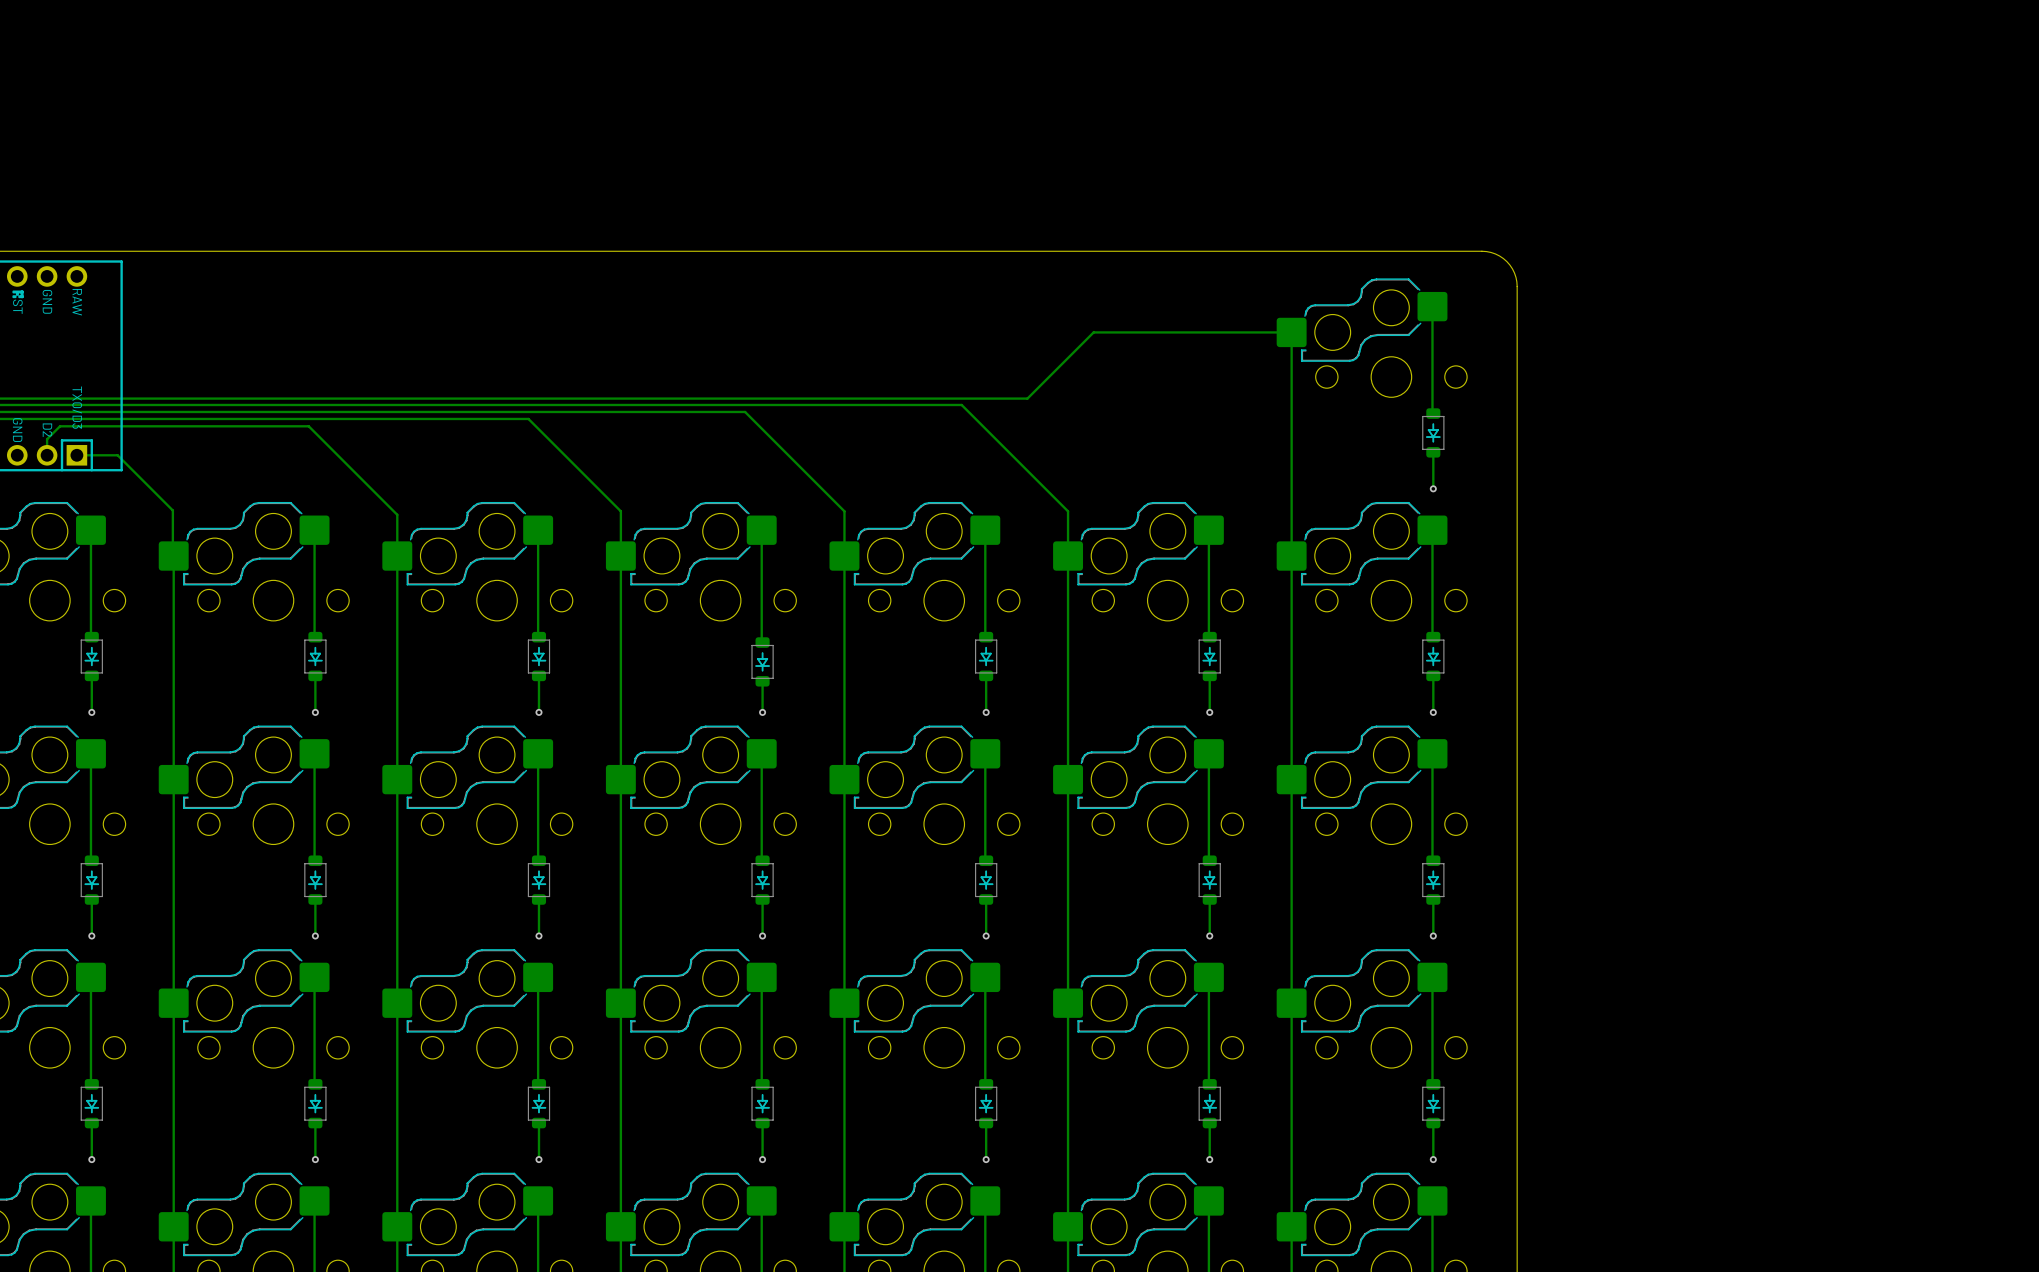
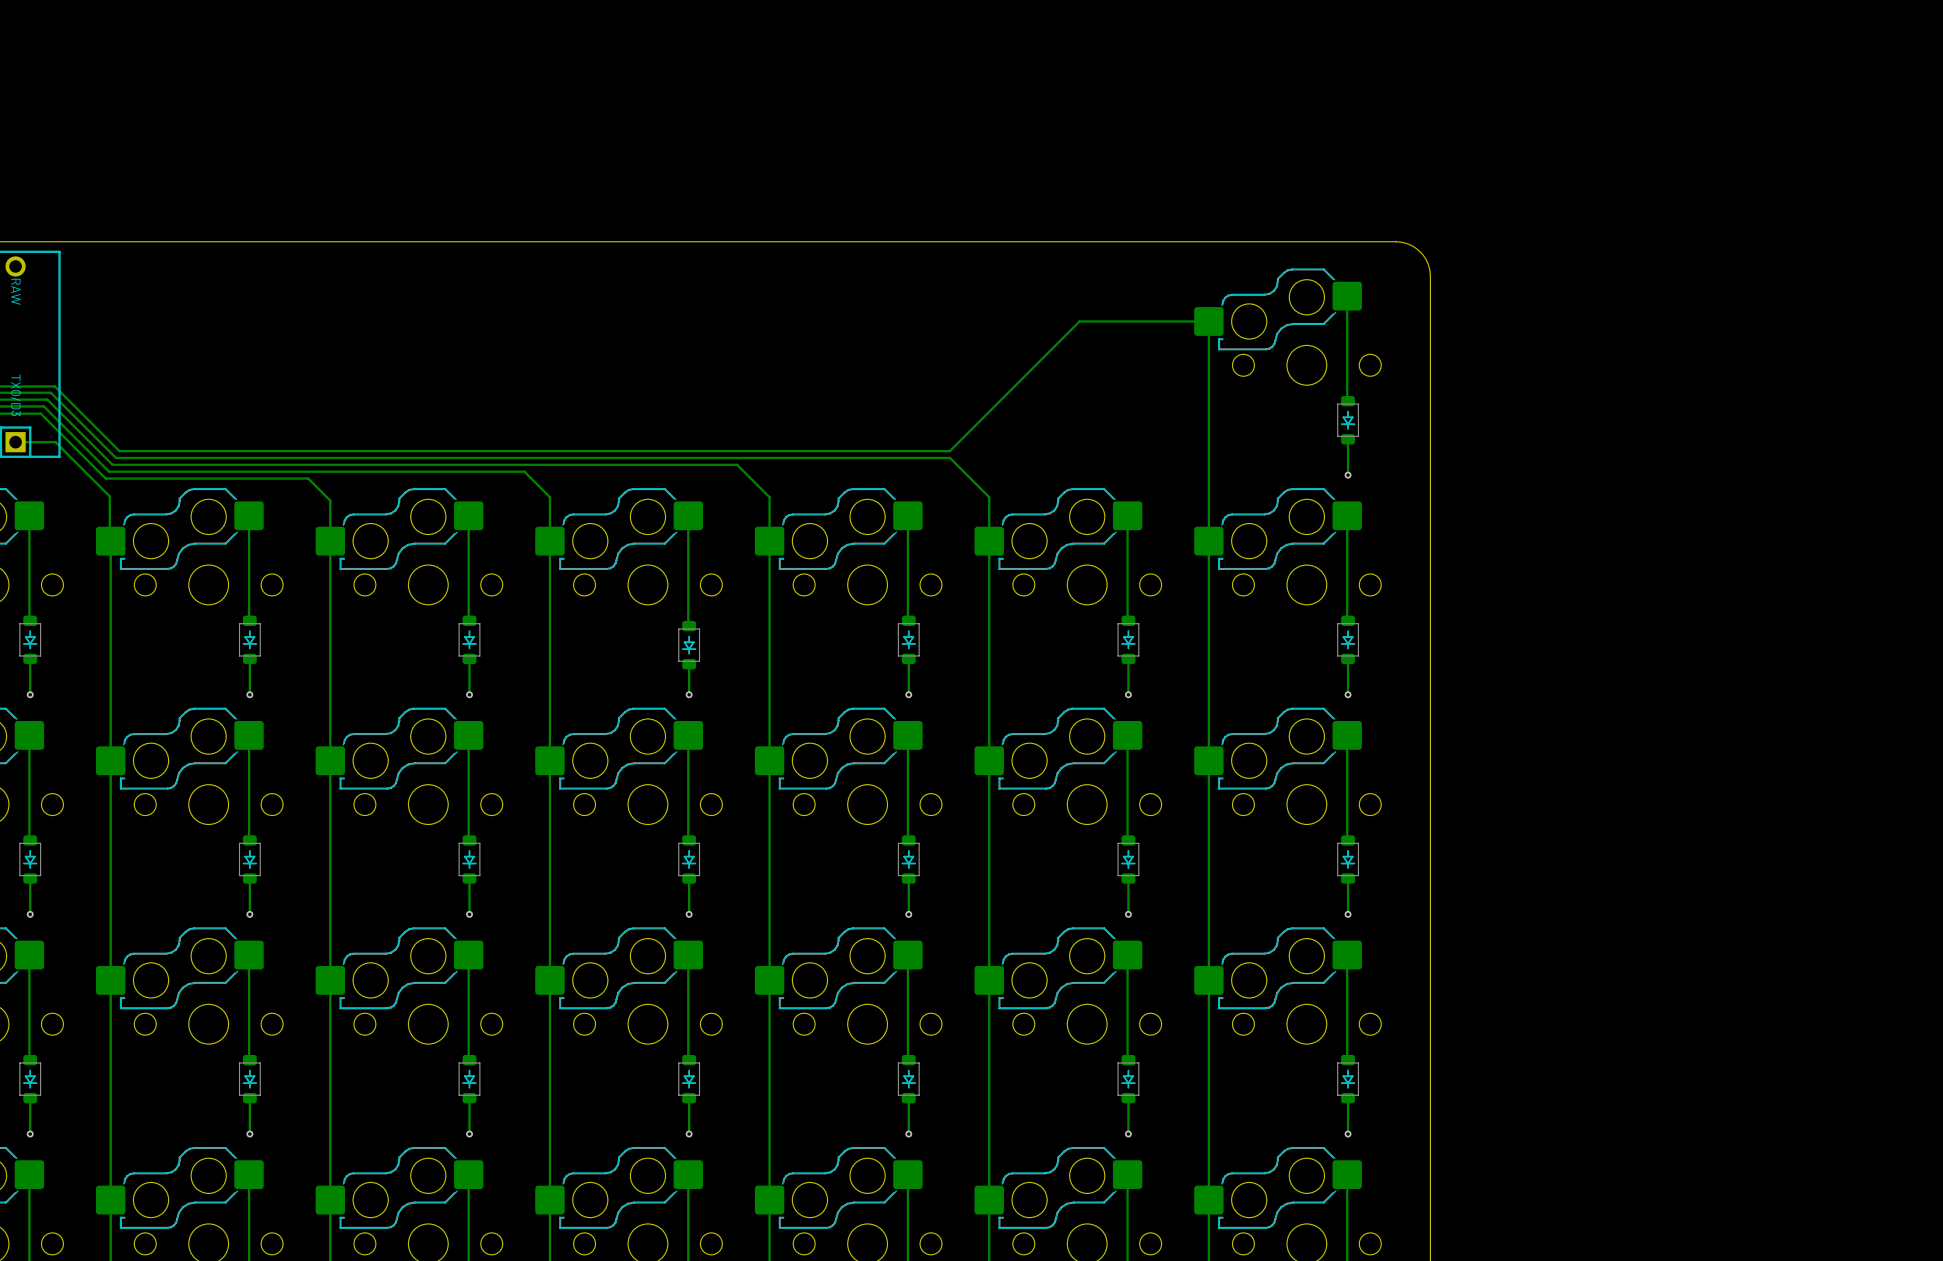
track: (1160, 332) (1093, 332) (1027, 398) (116, 398) -> (1079, 321) (949, 451) (119, 451) (54, 386)
track: (112, 404) (961, 404) (1028, 471) -> (50, 392) (116, 457) (949, 457)
track: (109, 411) (745, 411) (811, 478) -> (47, 399) (112, 464) (737, 464)
track: (105, 418) (528, 418) (594, 485) -> (43, 406) (109, 471) (524, 471)
track: (102, 426) (308, 426) (374, 492) -> (40, 413) (105, 478) (308, 478)

